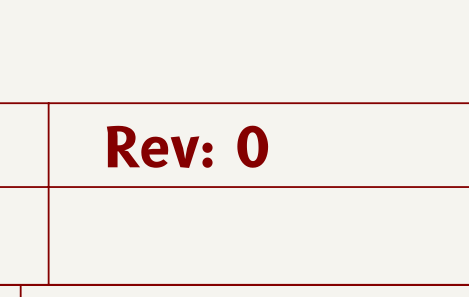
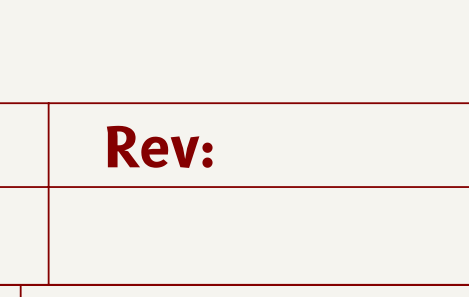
title block: Rev: 0 (187, 146) -> Rev: (159, 146)

